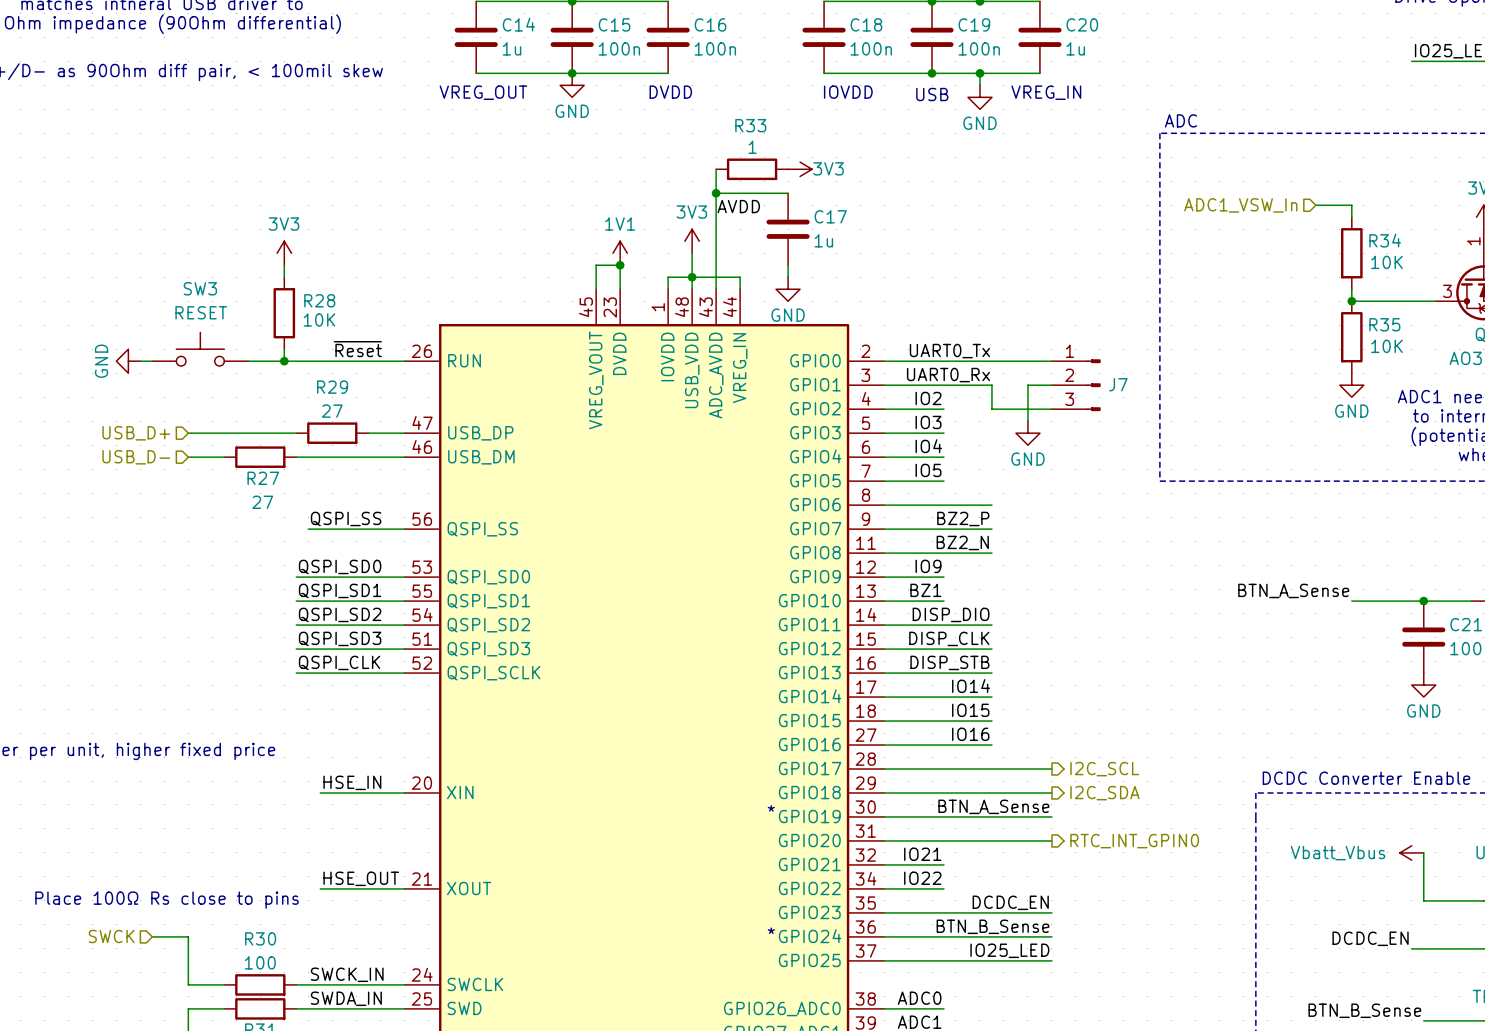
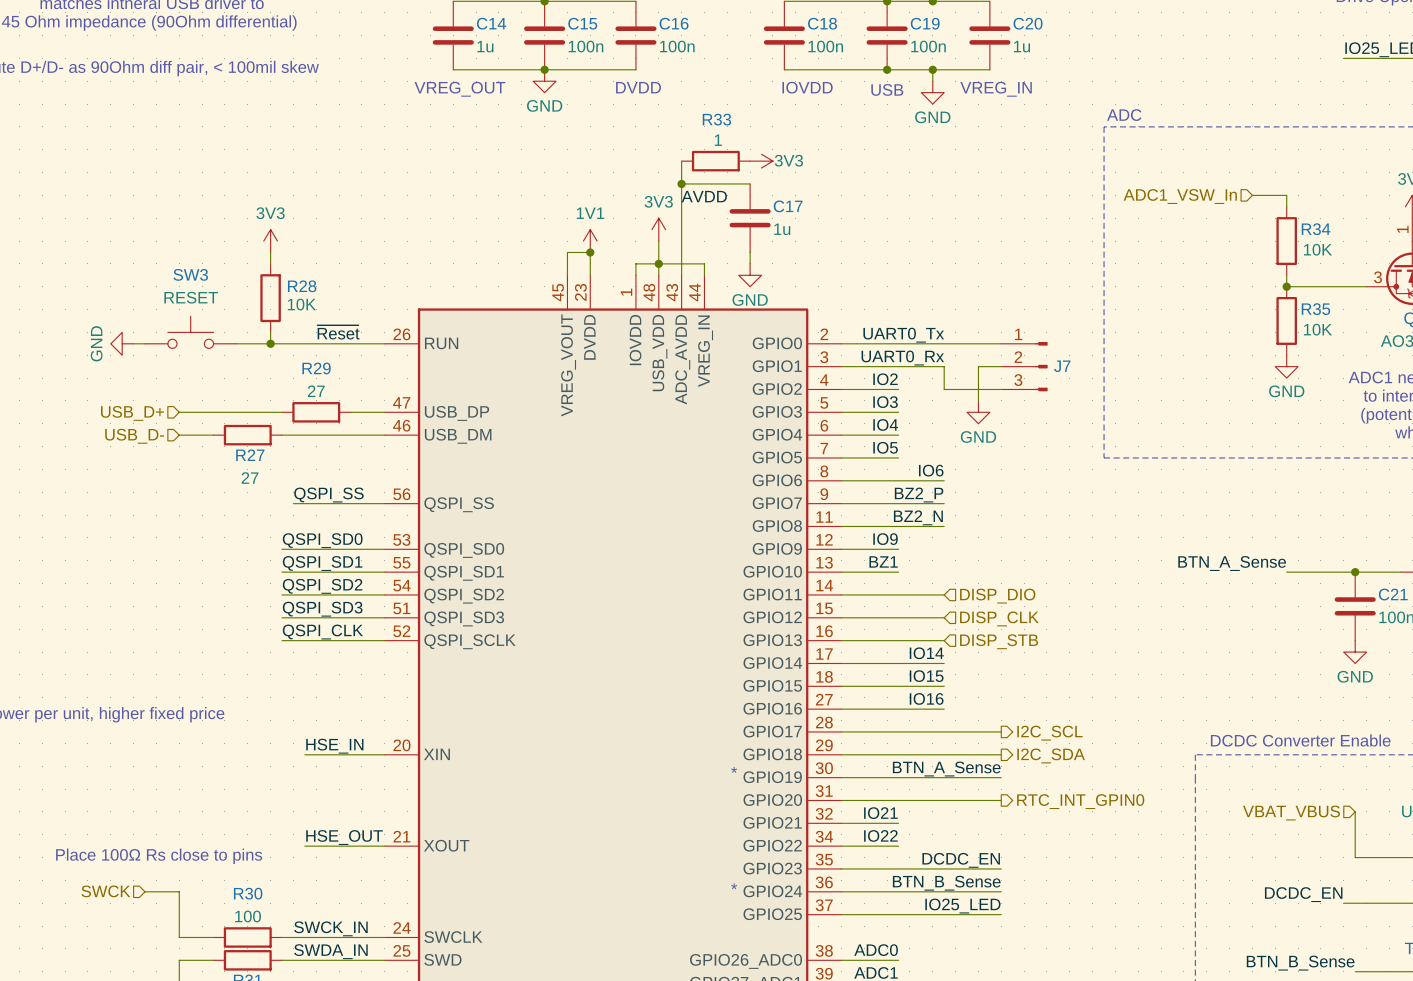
label: none -> IO6 (931, 470)
label: DISP_DIO (951, 614) -> none
hierarchical label: none -> DISP_DIO (997, 596)
label: DISP_CLK (949, 638) -> none
hierarchical label: none -> DISP_CLK (999, 618)
label: DISP_STB (949, 662) -> none
hierarchical label: none -> DISP_STB (999, 641)
power symbol: Vbatt_Vbus (1411, 852) -> none
hierarchical label: none -> VBAT_VBUS (1291, 813)

